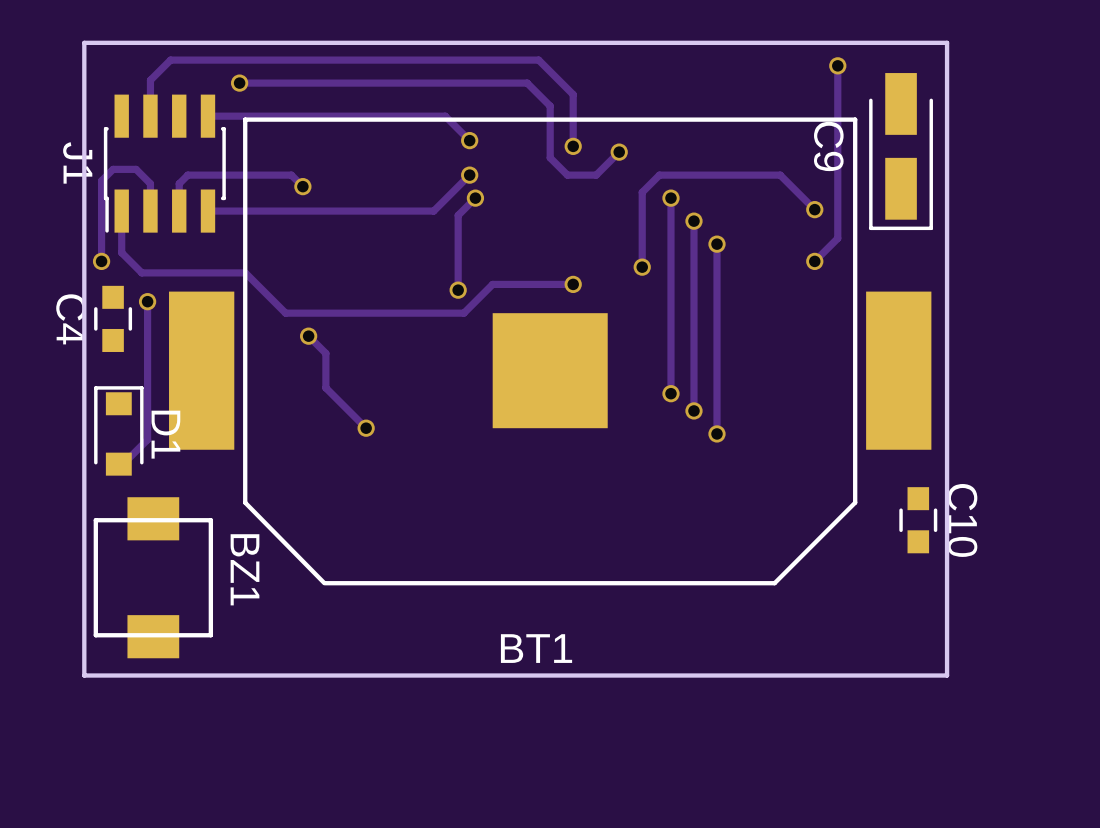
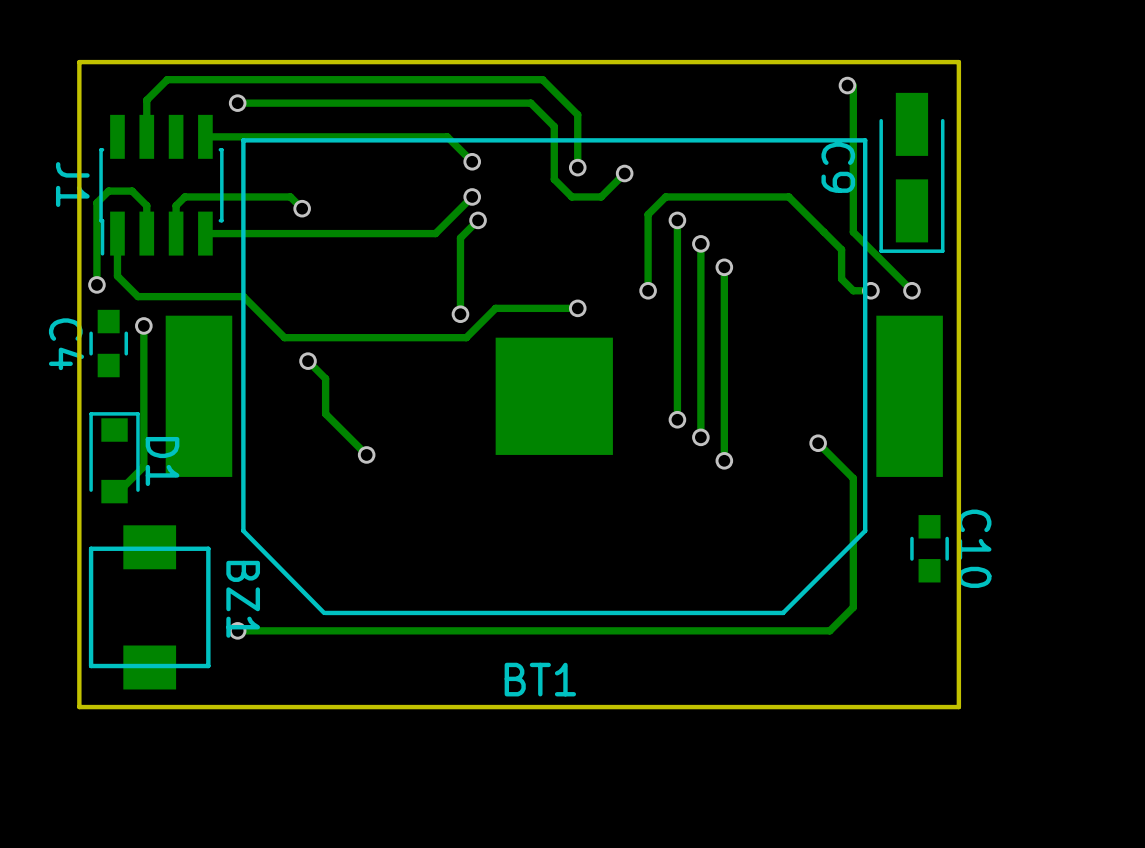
track: (837, 65) (837, 238) (814, 261) -> none
track: none -> (853, 85) (853, 232) (911, 290)
track: none -> (824, 232) (841, 249) (841, 279) (853, 290) (870, 290)
via: (814, 209) -> none
via: (814, 261) -> none
via: none -> (870, 290)
via: none -> (911, 290)
track: none -> (818, 443) (853, 478) (853, 607) (829, 630) (237, 630)
via: none -> (818, 443)
via: none -> (237, 630)

